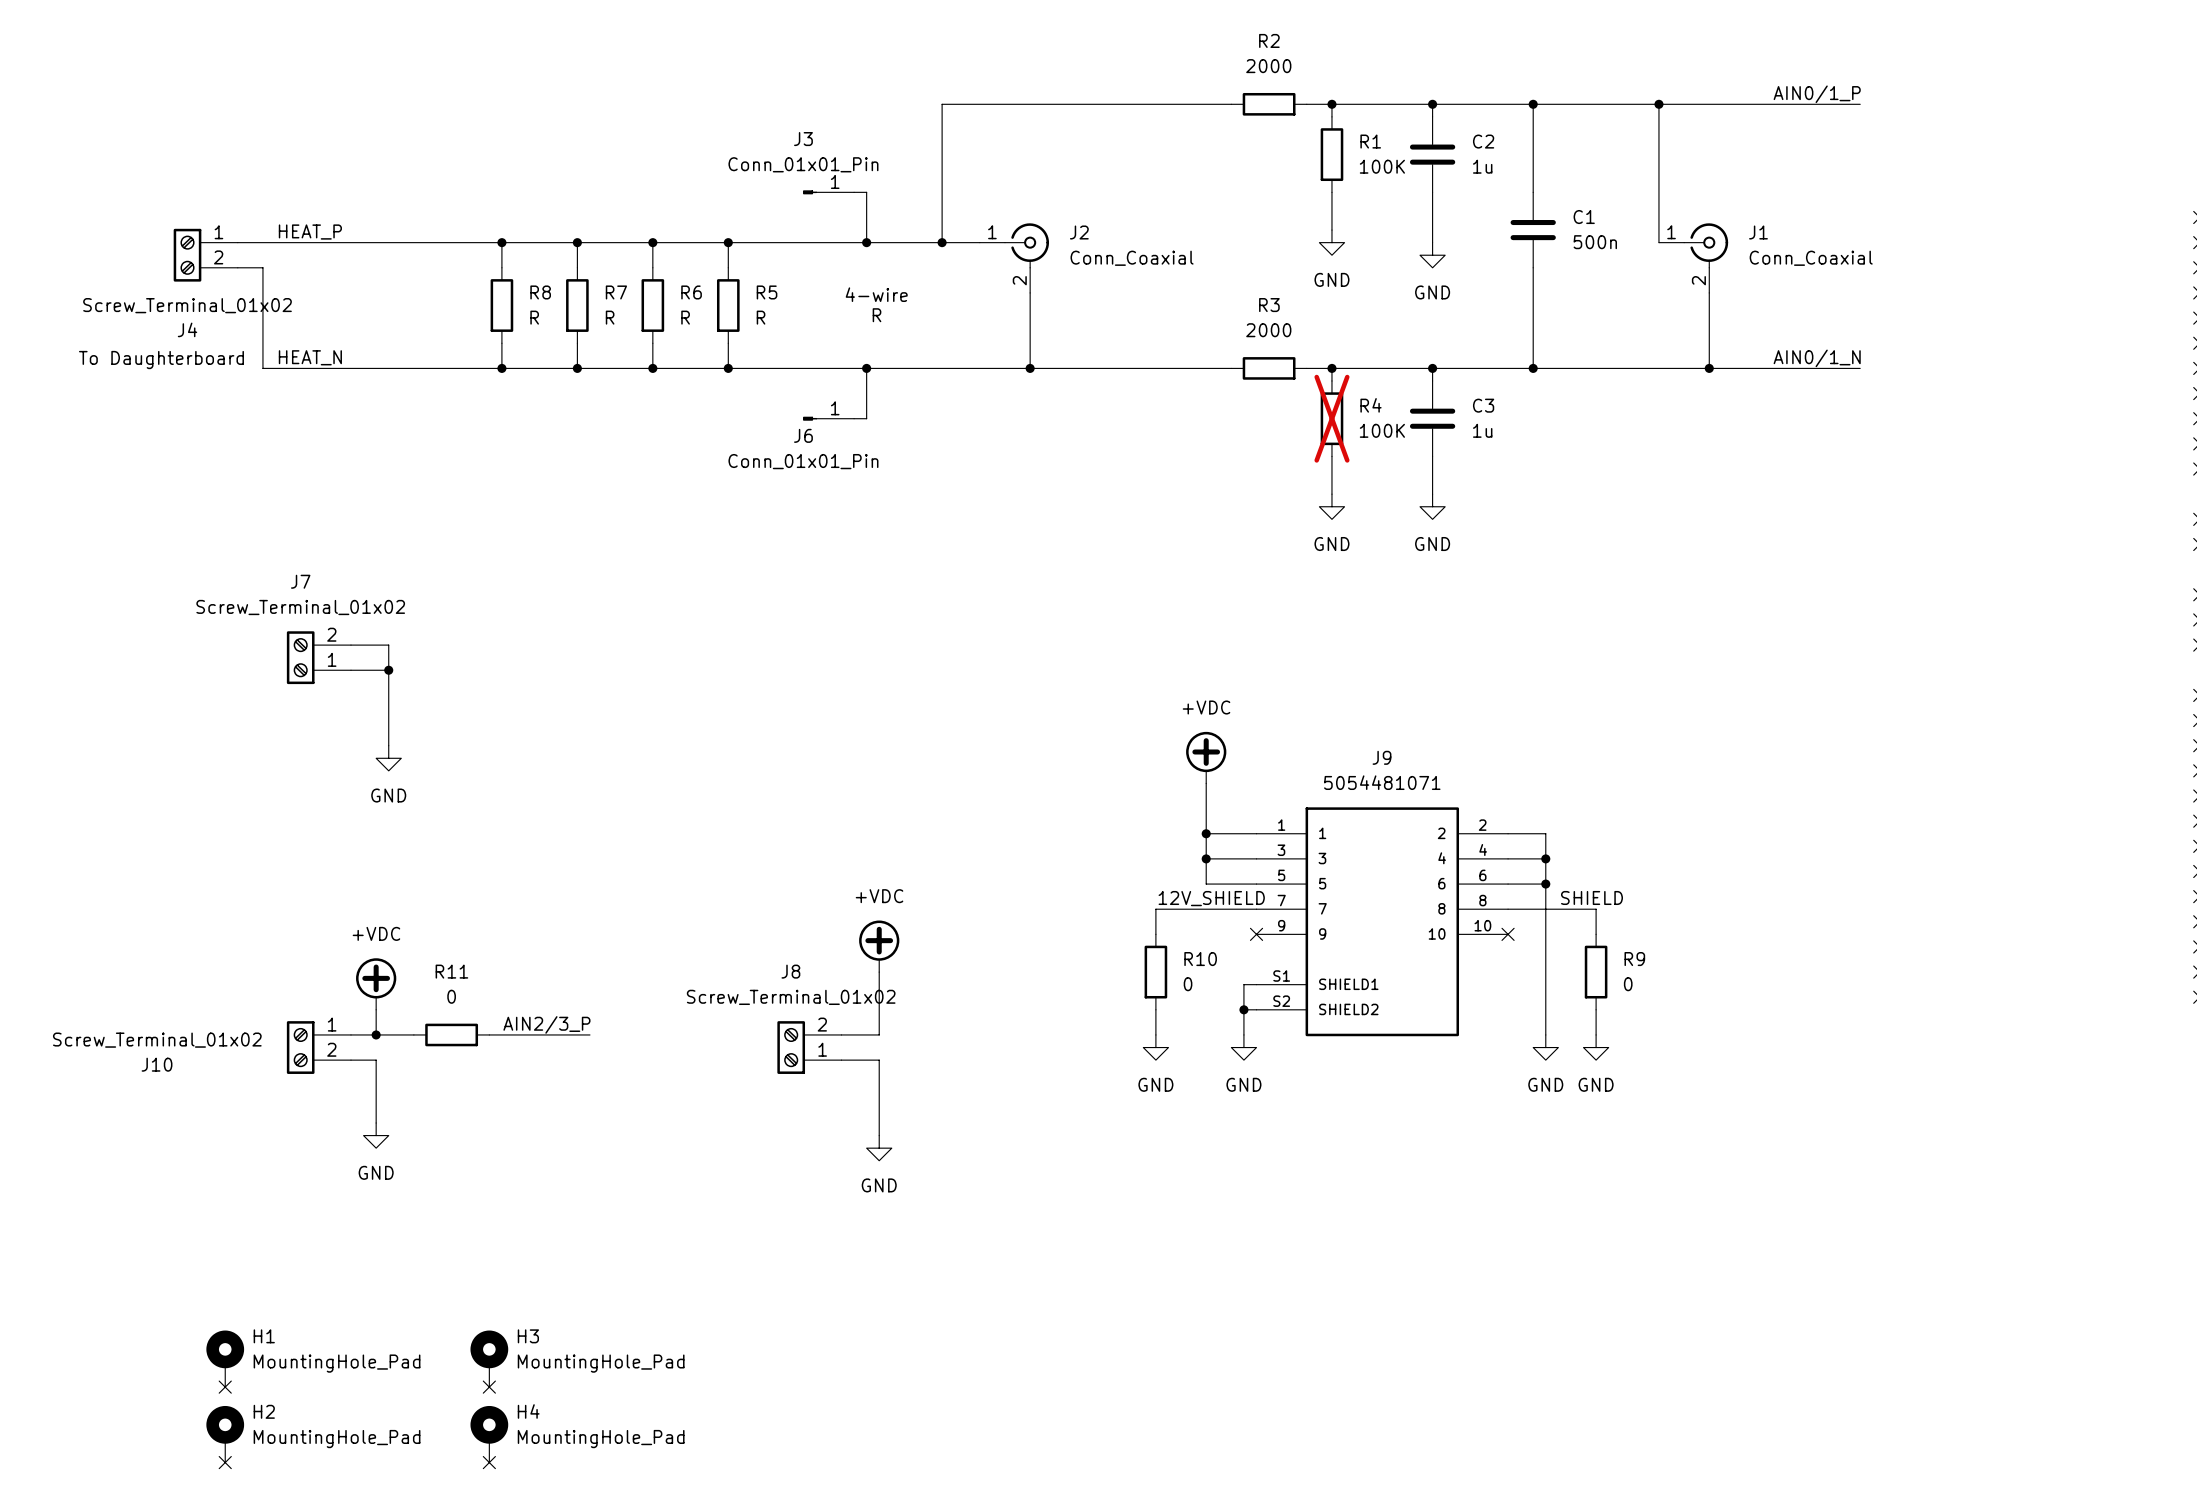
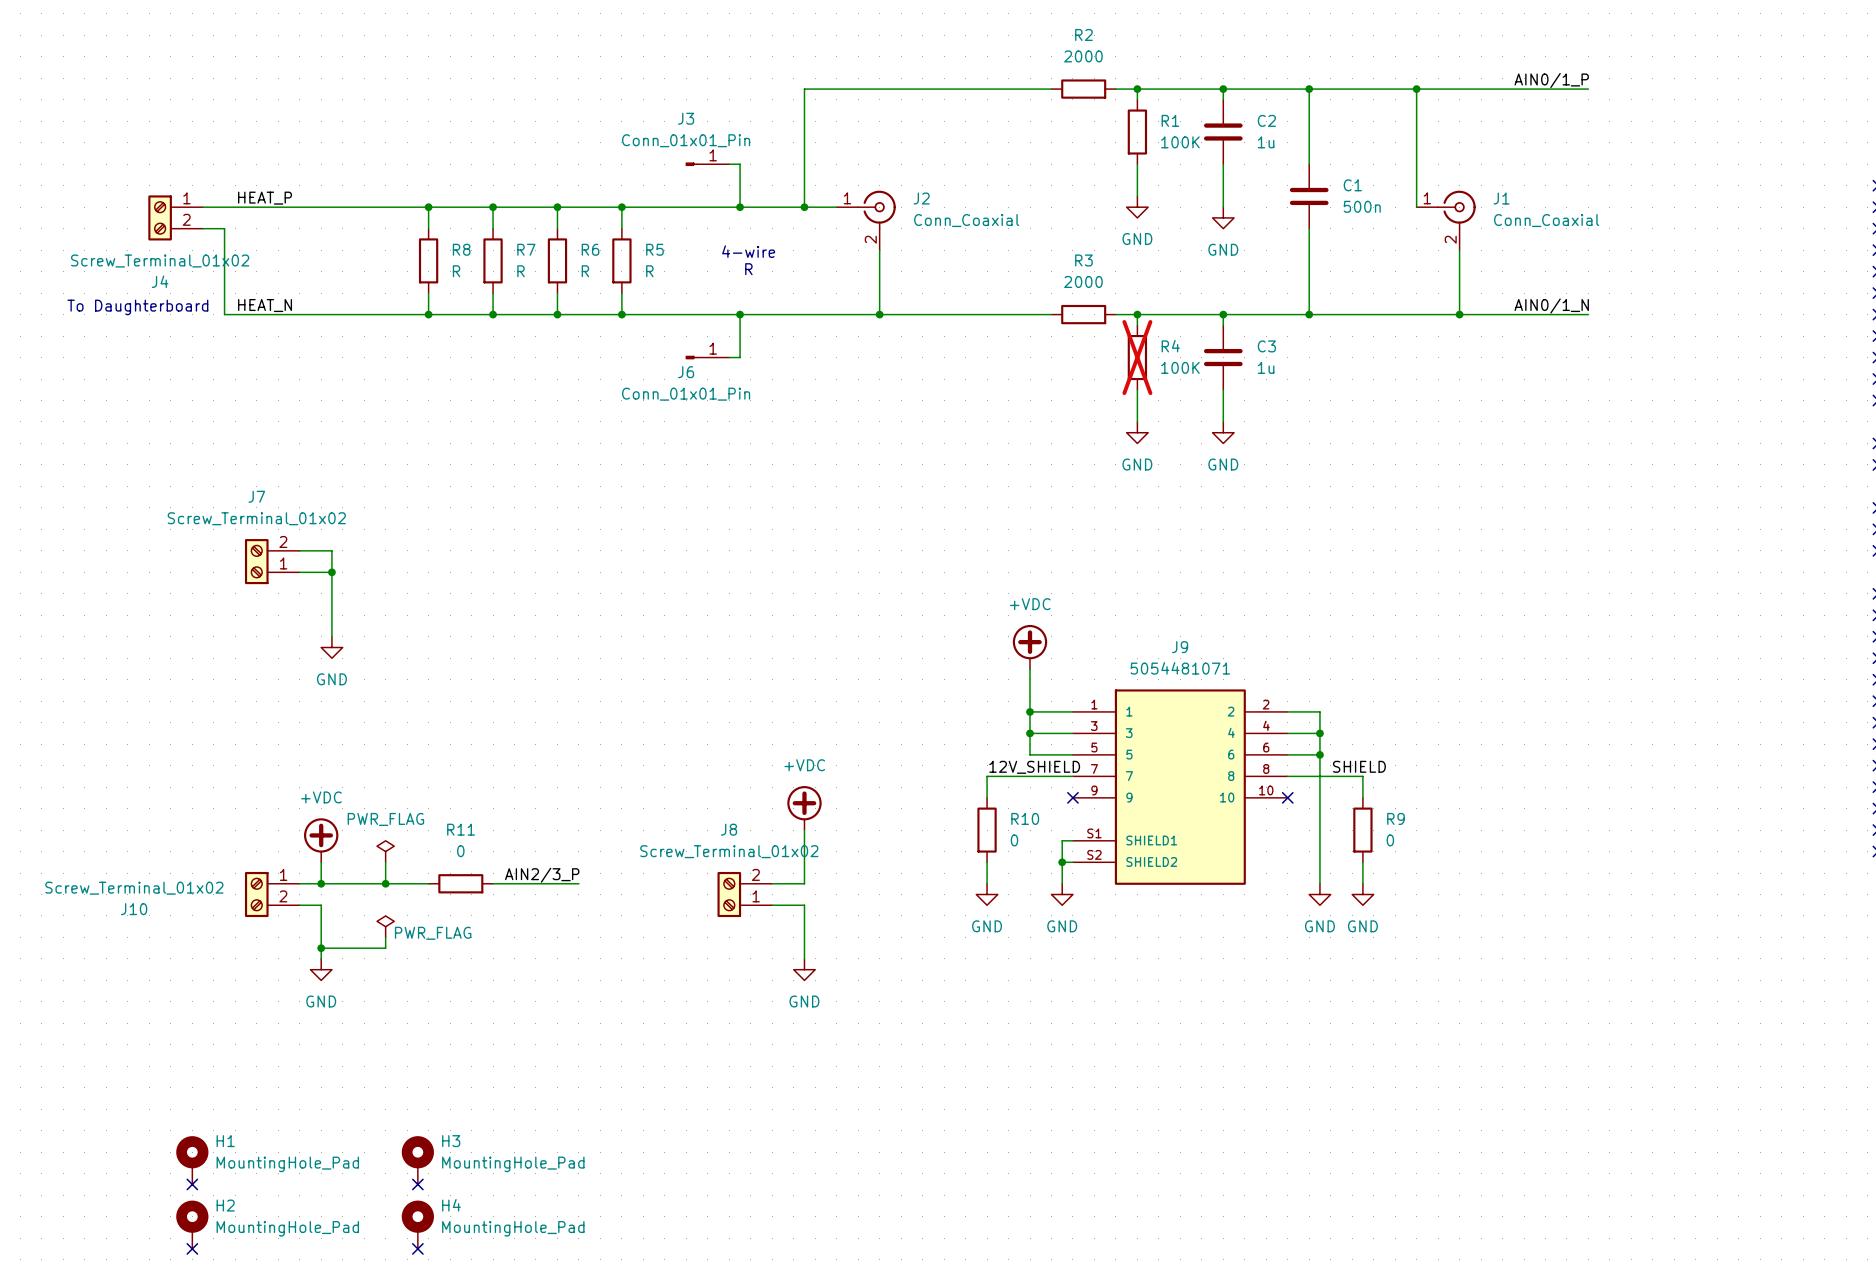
power symbol position: +VDC (879, 946) -> +VDC (804, 808)
wire: (879, 972) (879, 1034) (841, 1034) -> (804, 830) (804, 883) (772, 883)
power symbol: none -> PWR_FLAG (385, 851)
wire: none -> (385, 862) (385, 883)
label position: AIN2/3_P (546, 1024) -> AIN2/3_P (542, 875)
R11 position: (451, 1034) -> (460, 883)
junction: none -> (385, 883)
wire: (501, 1034) (577, 1034) -> (353, 883) (417, 883)
wire: none -> (503, 883) (578, 883)
J8 position: (809, 1047) -> (744, 894)
wire: (841, 1060) (879, 1060) (879, 1135) -> none
wire: none -> (772, 905) (804, 905) (804, 958)
power symbol: none -> PWR_FLAG (385, 926)
wire: none -> (385, 937) (385, 948) (321, 948)
junction: none -> (321, 948)
power symbol position: GND (879, 1148) -> GND (804, 969)

